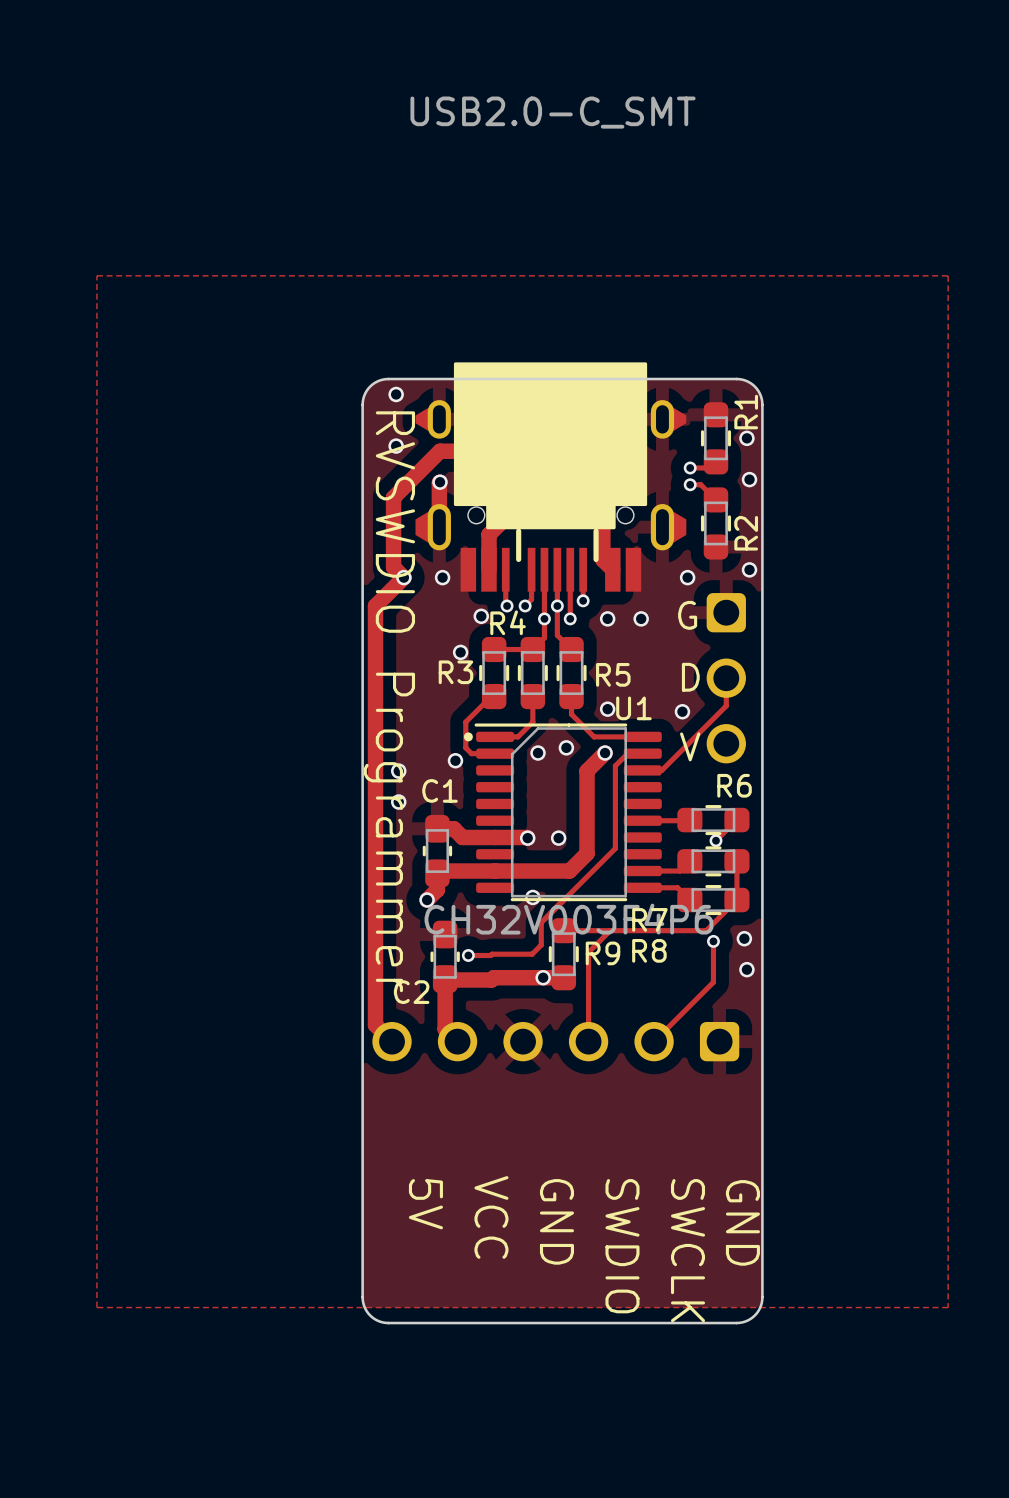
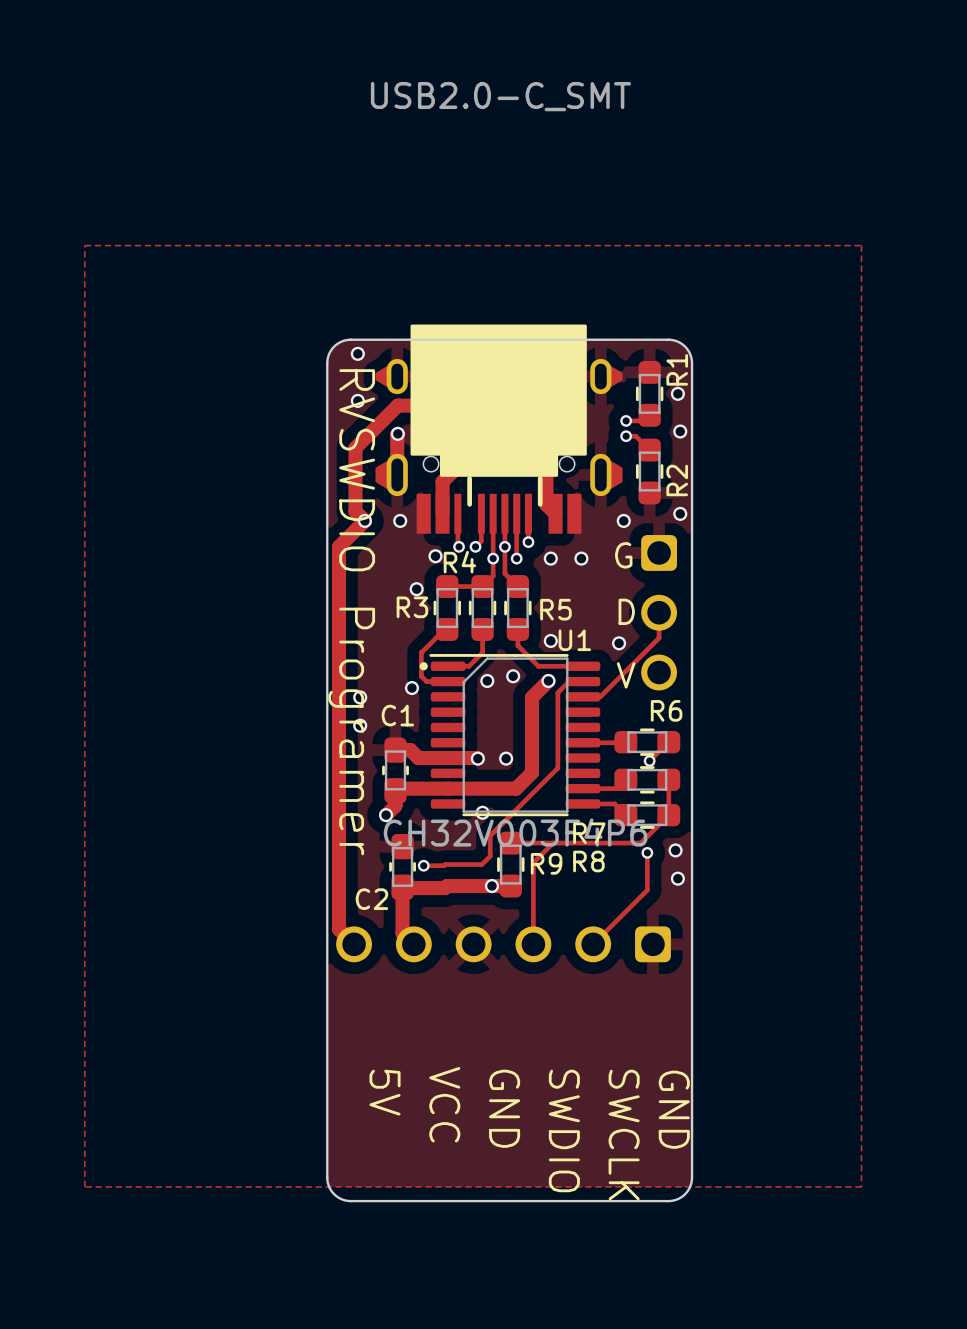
text: RVSWDIO Programmer (389, 701) -> RVSWDIO Programer (351, 612)

